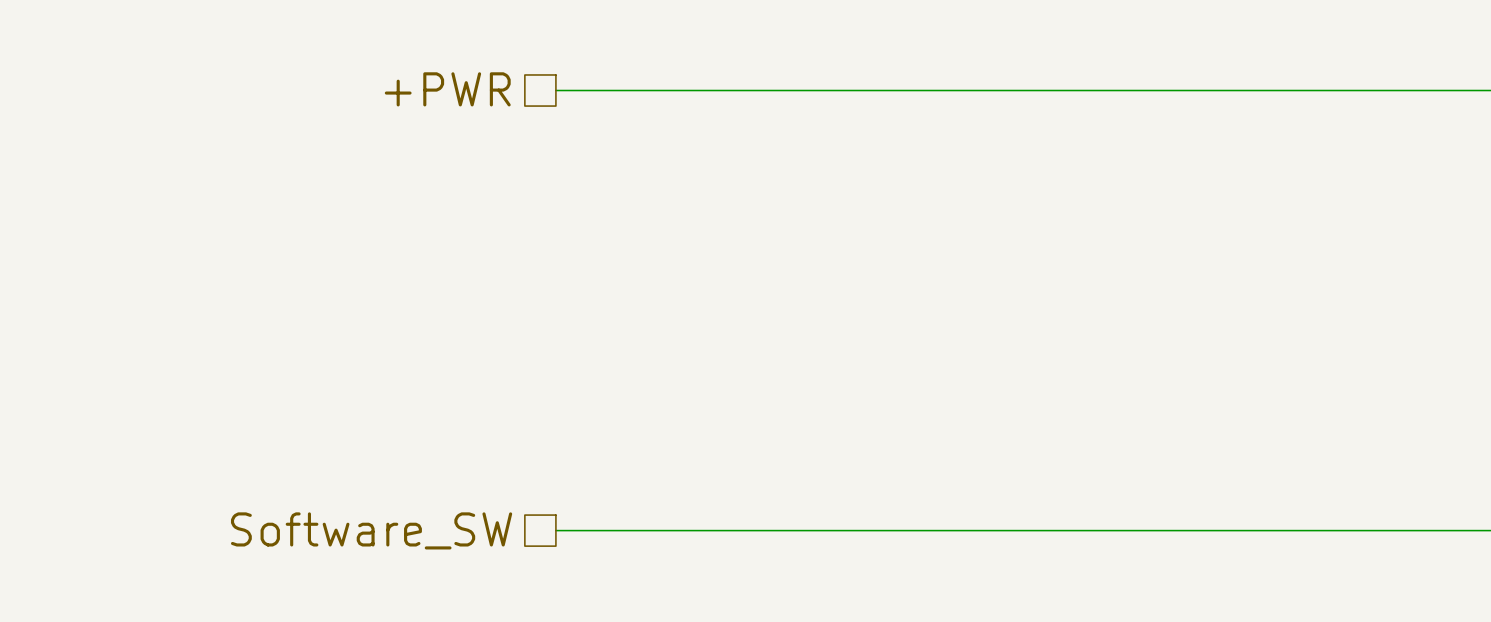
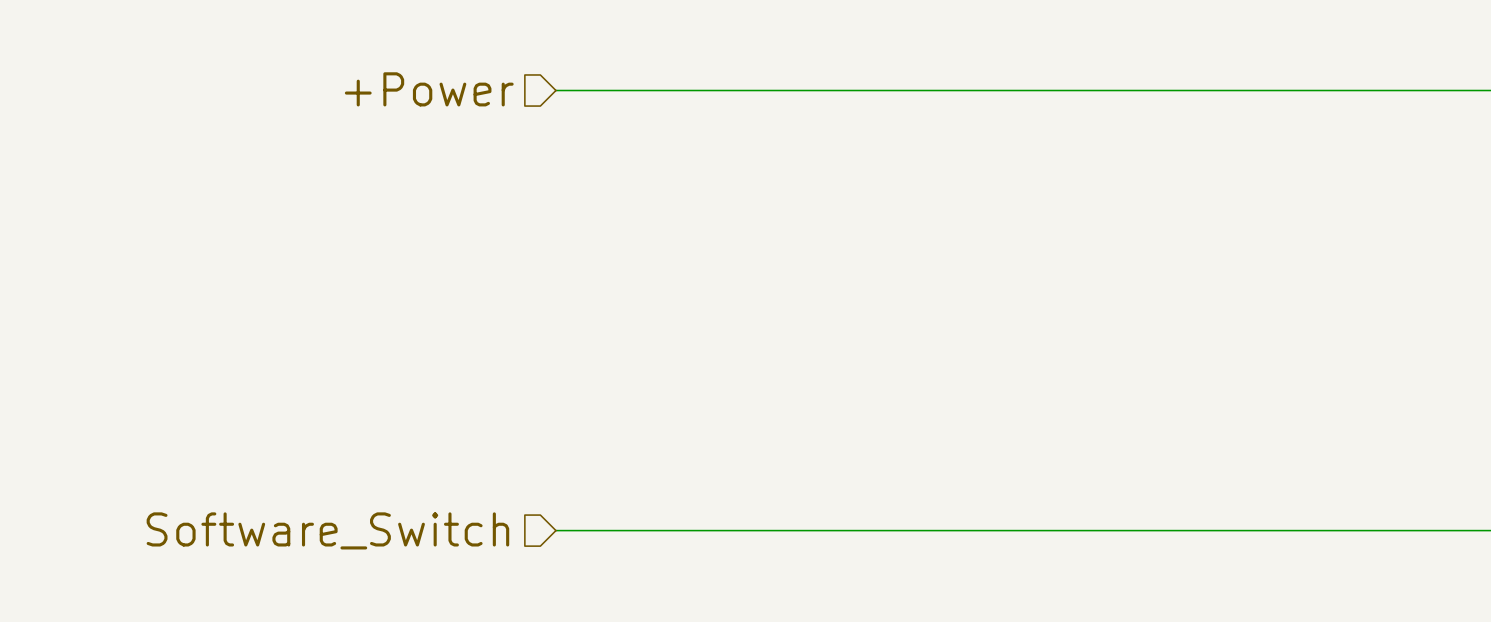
hierarchical label shape: passive (447, 89) -> input (429, 89)
hierarchical label: +PWR (447, 89) -> +Power (429, 89)
hierarchical label shape: passive (371, 530) -> input (327, 530)
hierarchical label: Software_SW (371, 530) -> Software_Switch (327, 530)

